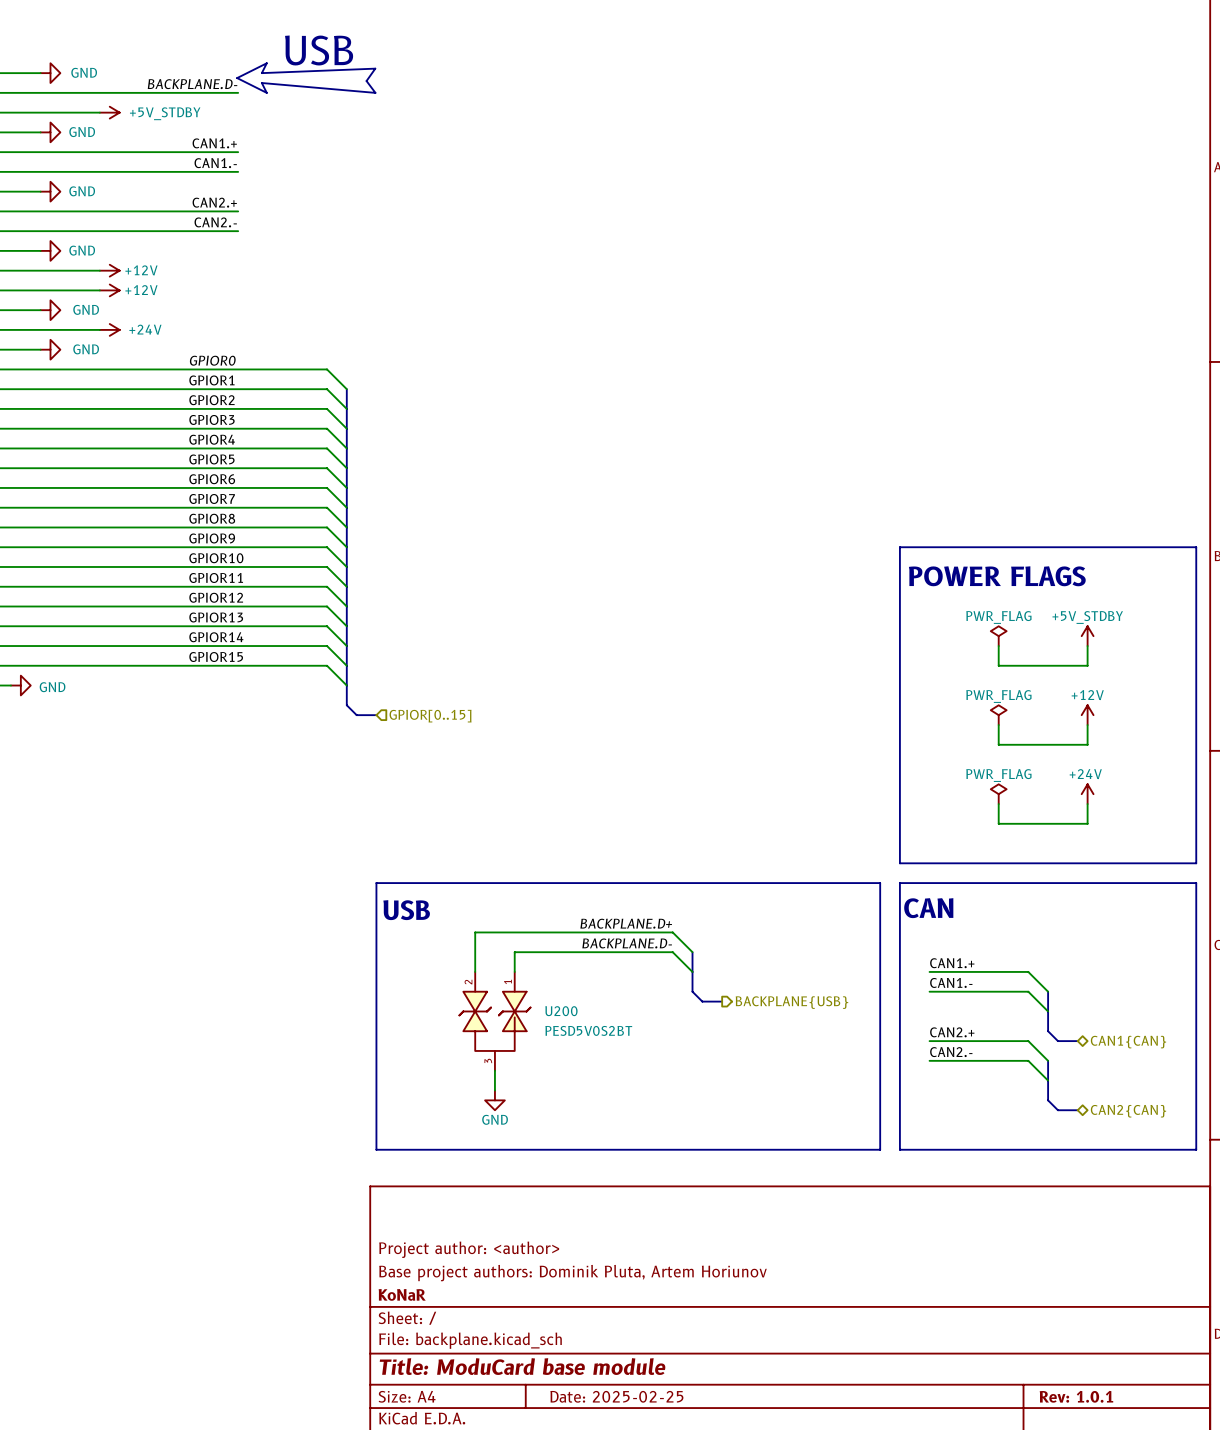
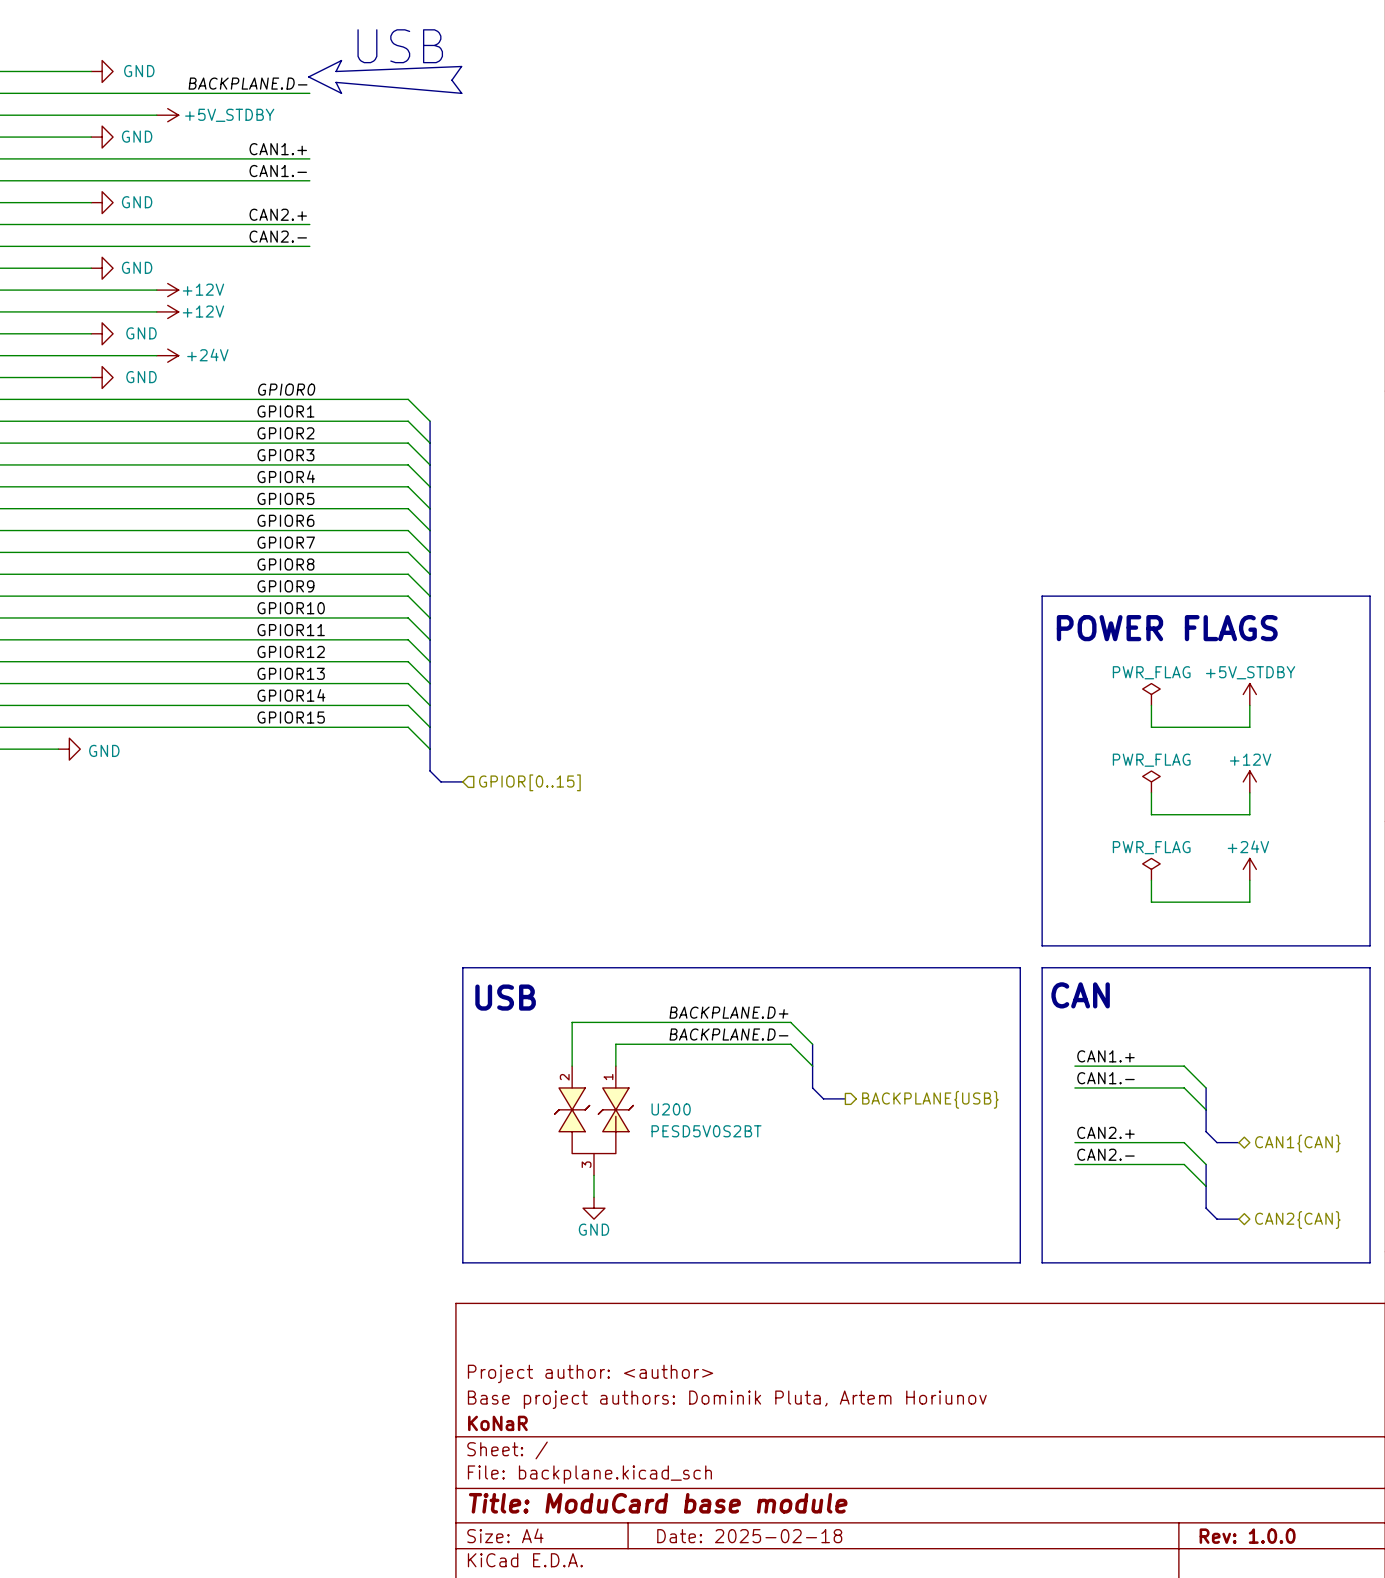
title block: Date: 2025-02-25 (616, 1396) -> Date: 2025-02-18 (749, 1536)
title block: Rev: 1.0.1 (1076, 1396) -> Rev: 1.0.0 (1247, 1536)

